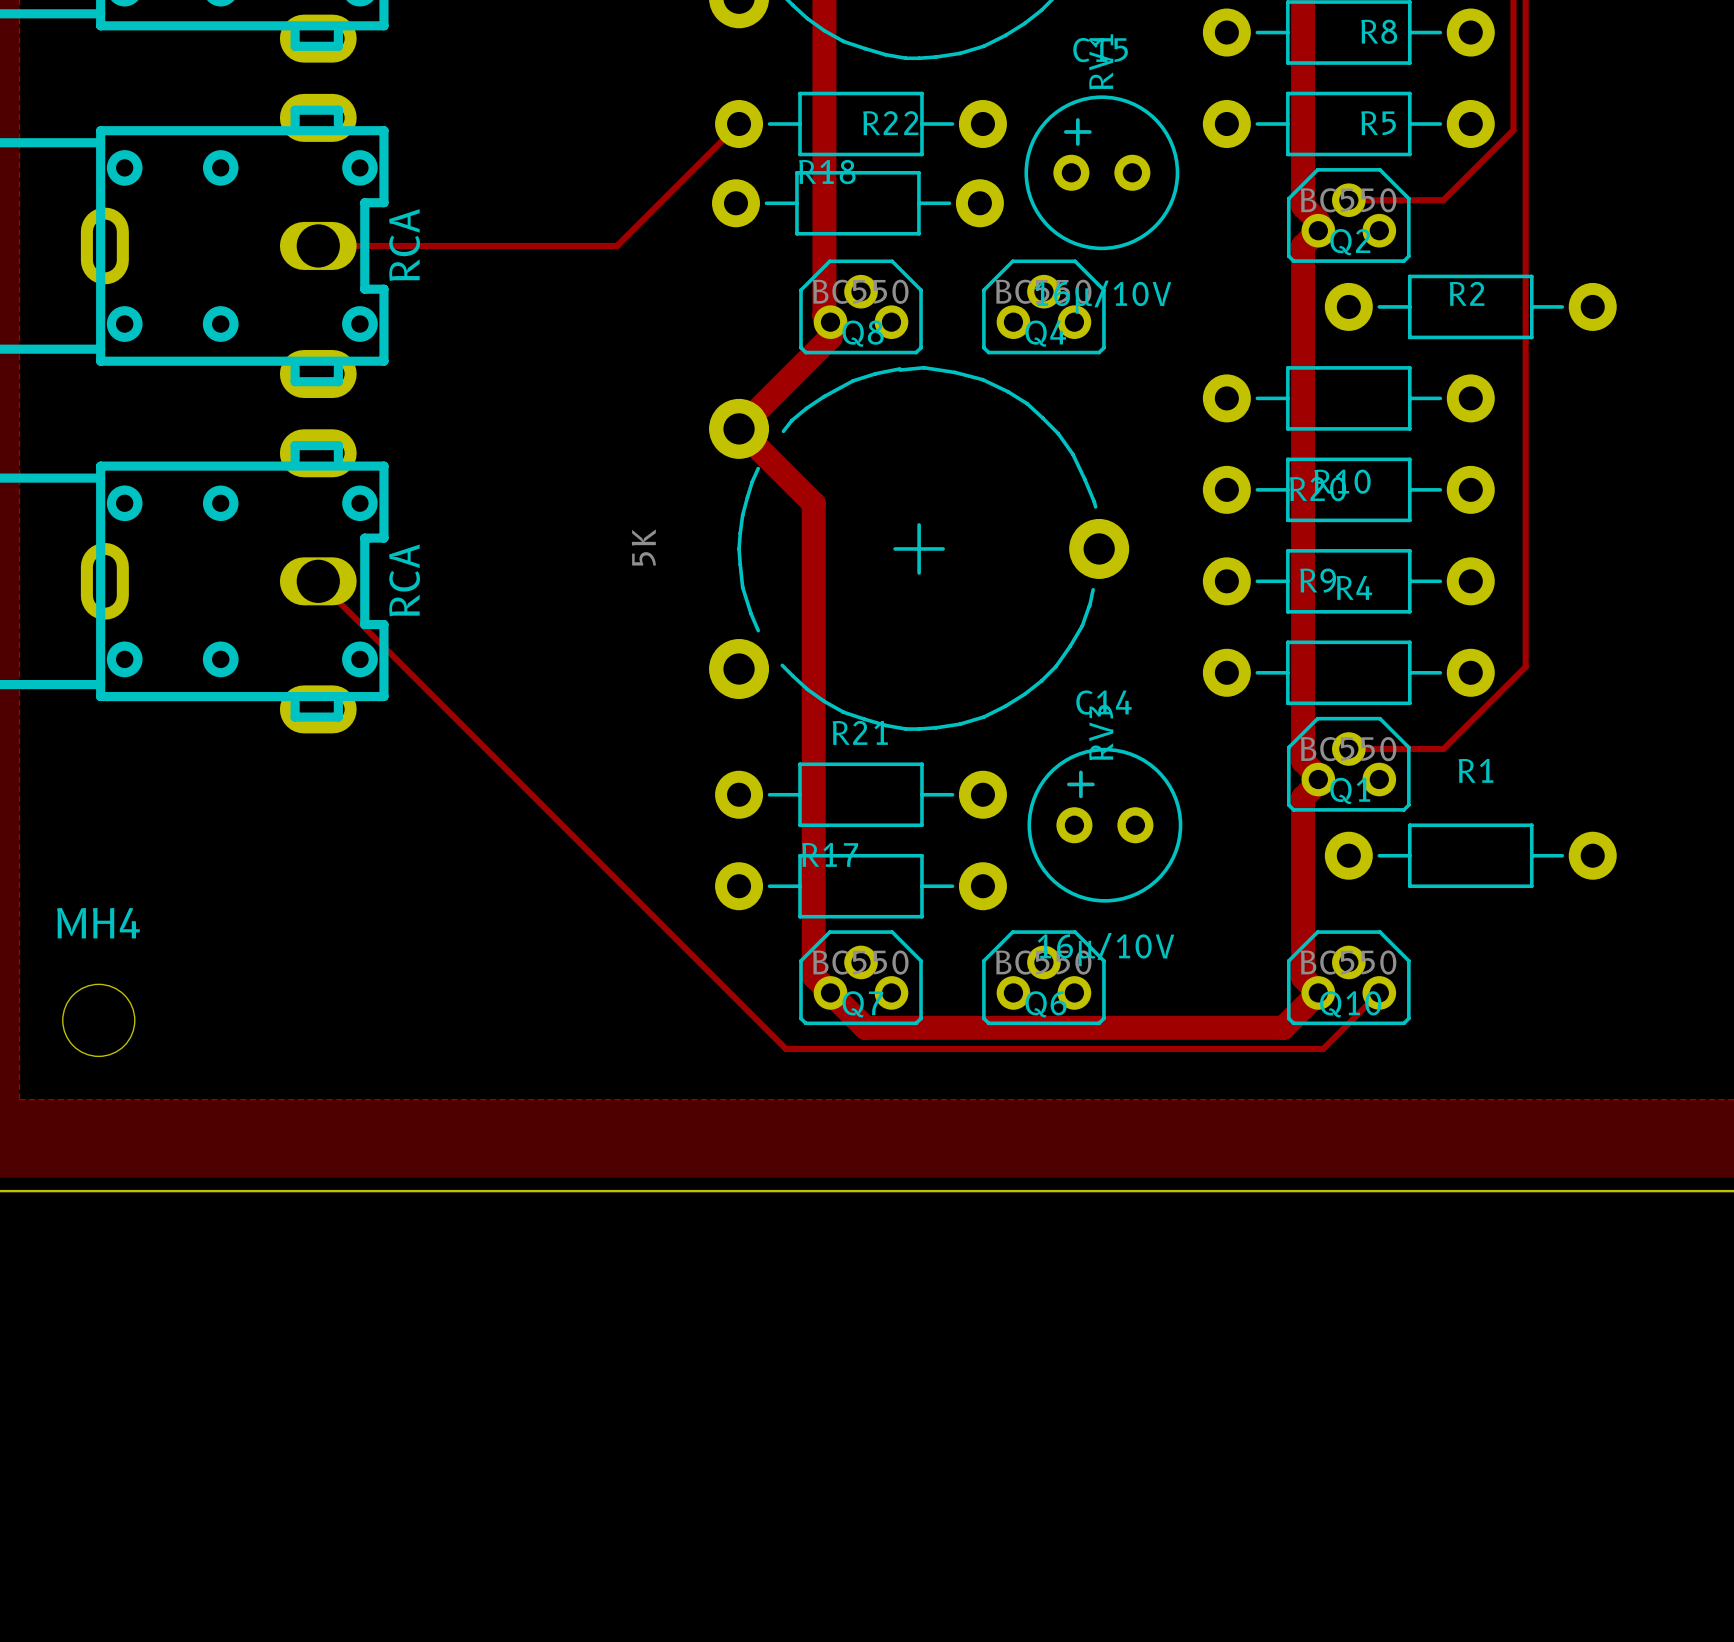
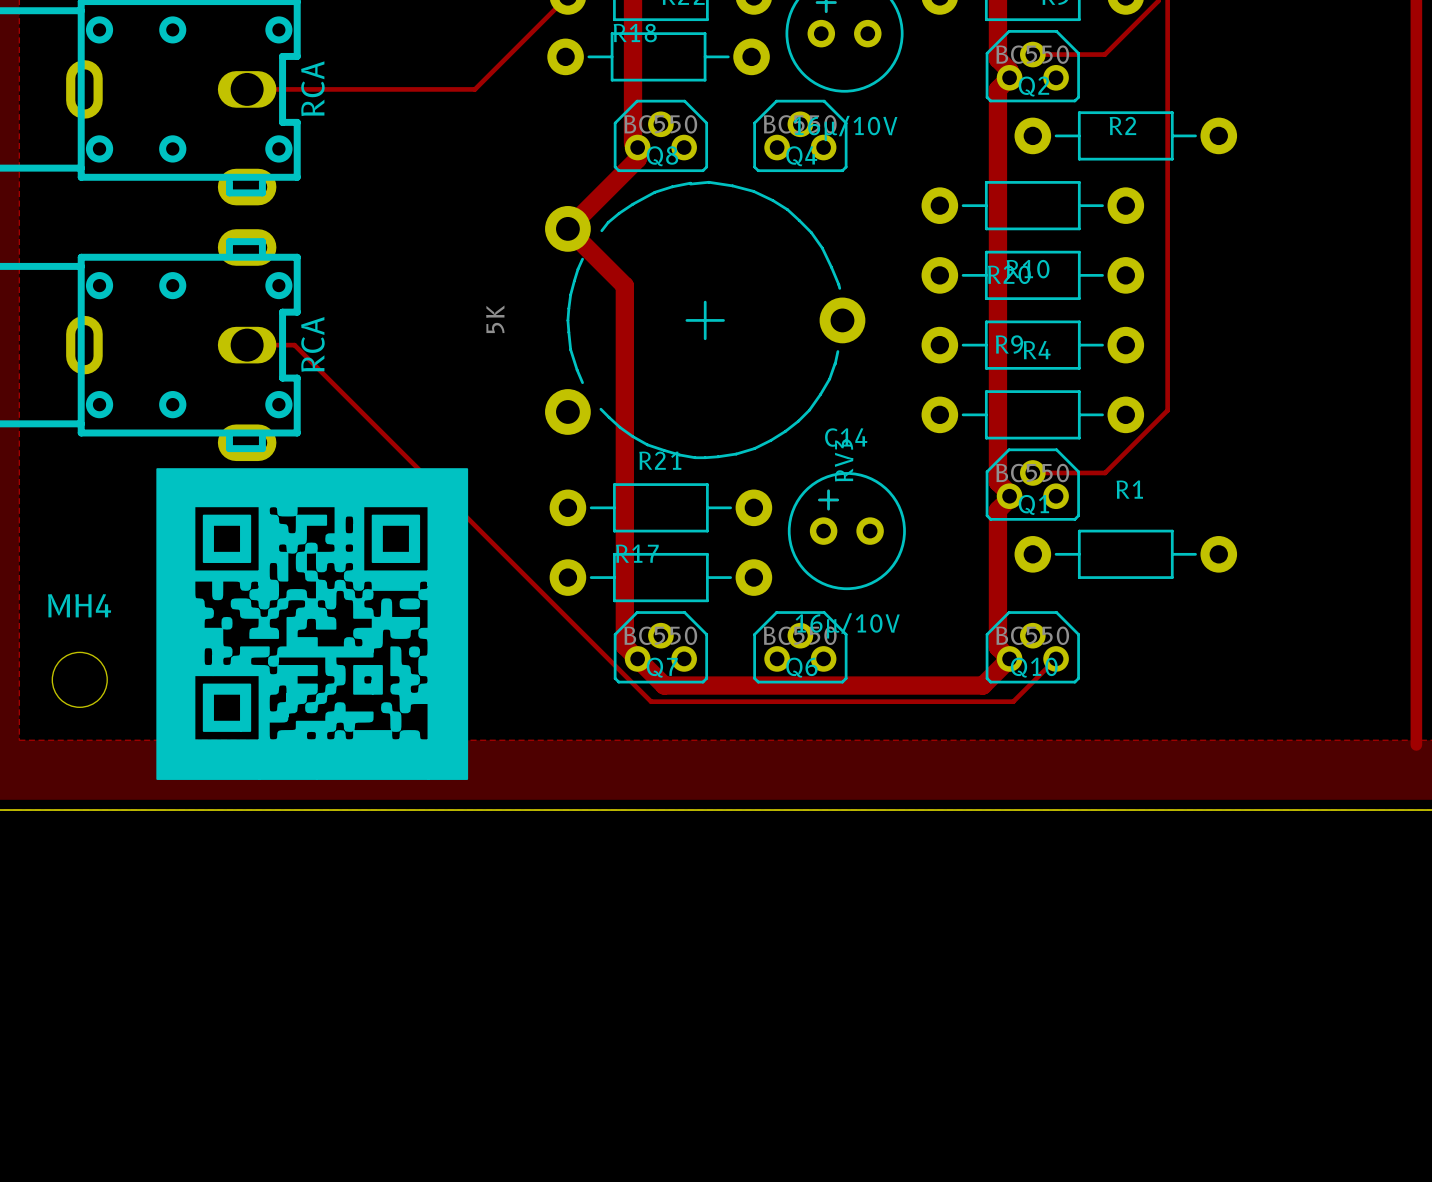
track: (318, 581) (785, 1048) (848, 1048) -> (247, 345) (294, 345) (651, 701)
drawing: none -> [156, 468, 469, 780]

